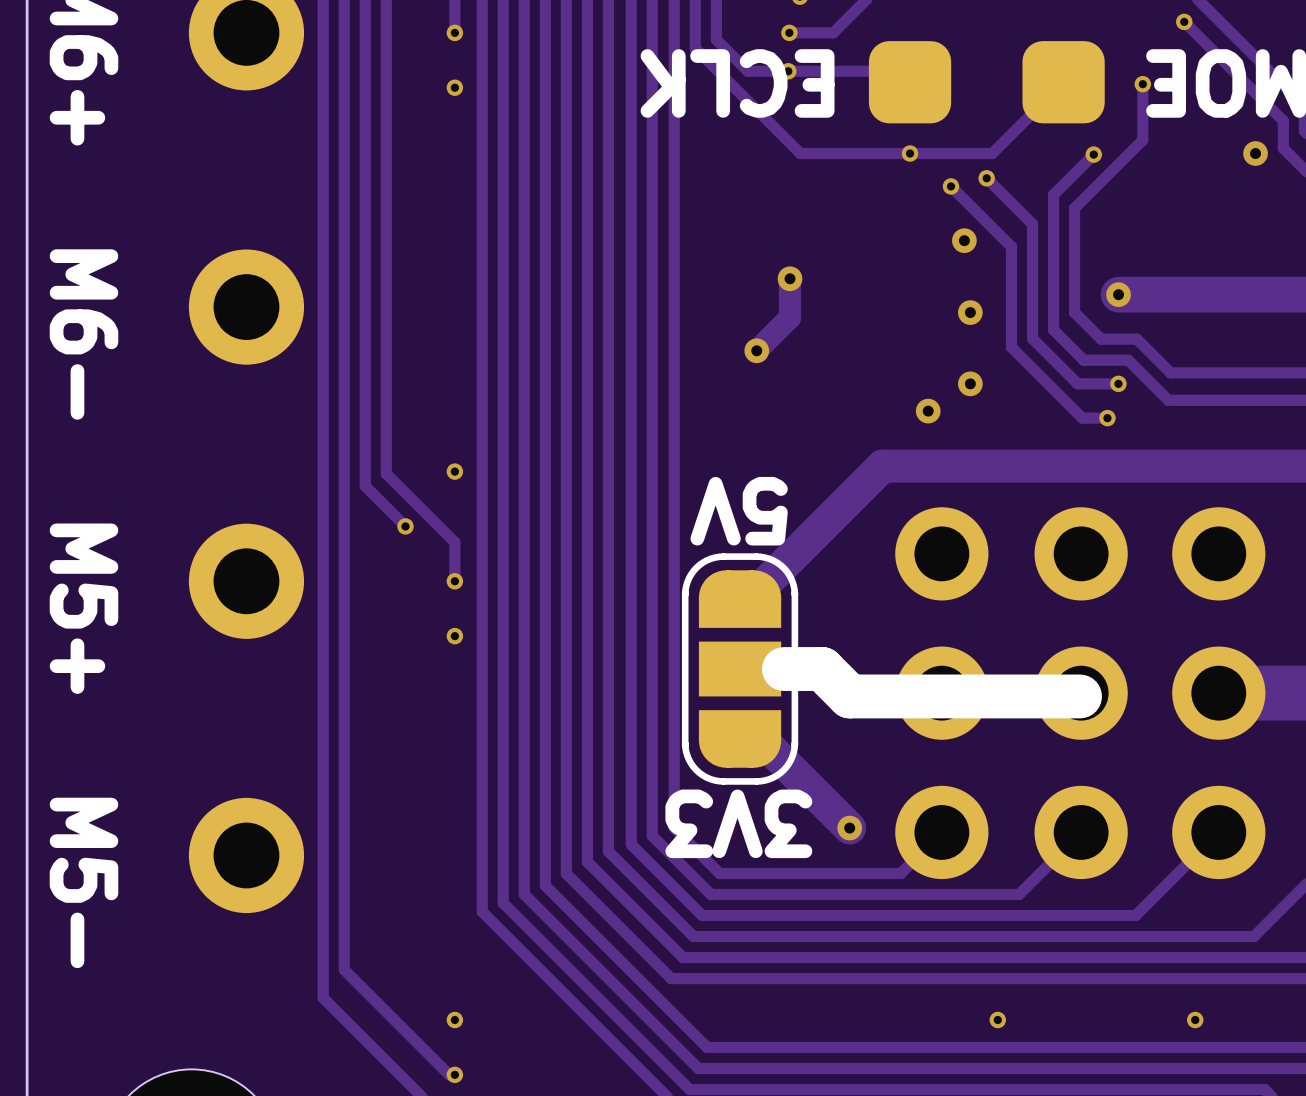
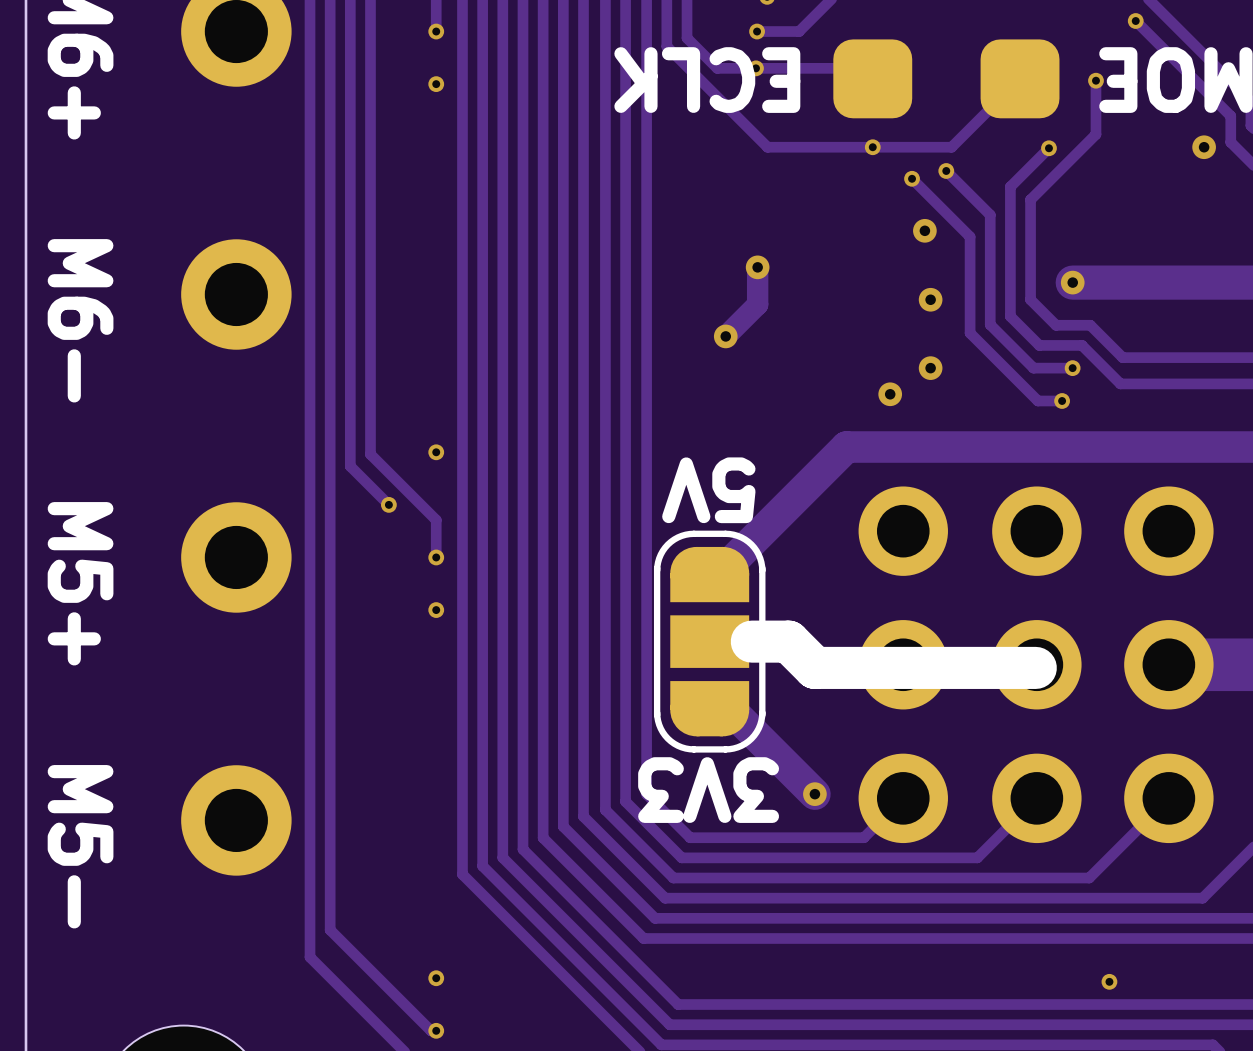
via: (997, 1020) -> none
via position: (1195, 1020) -> (1109, 981)

